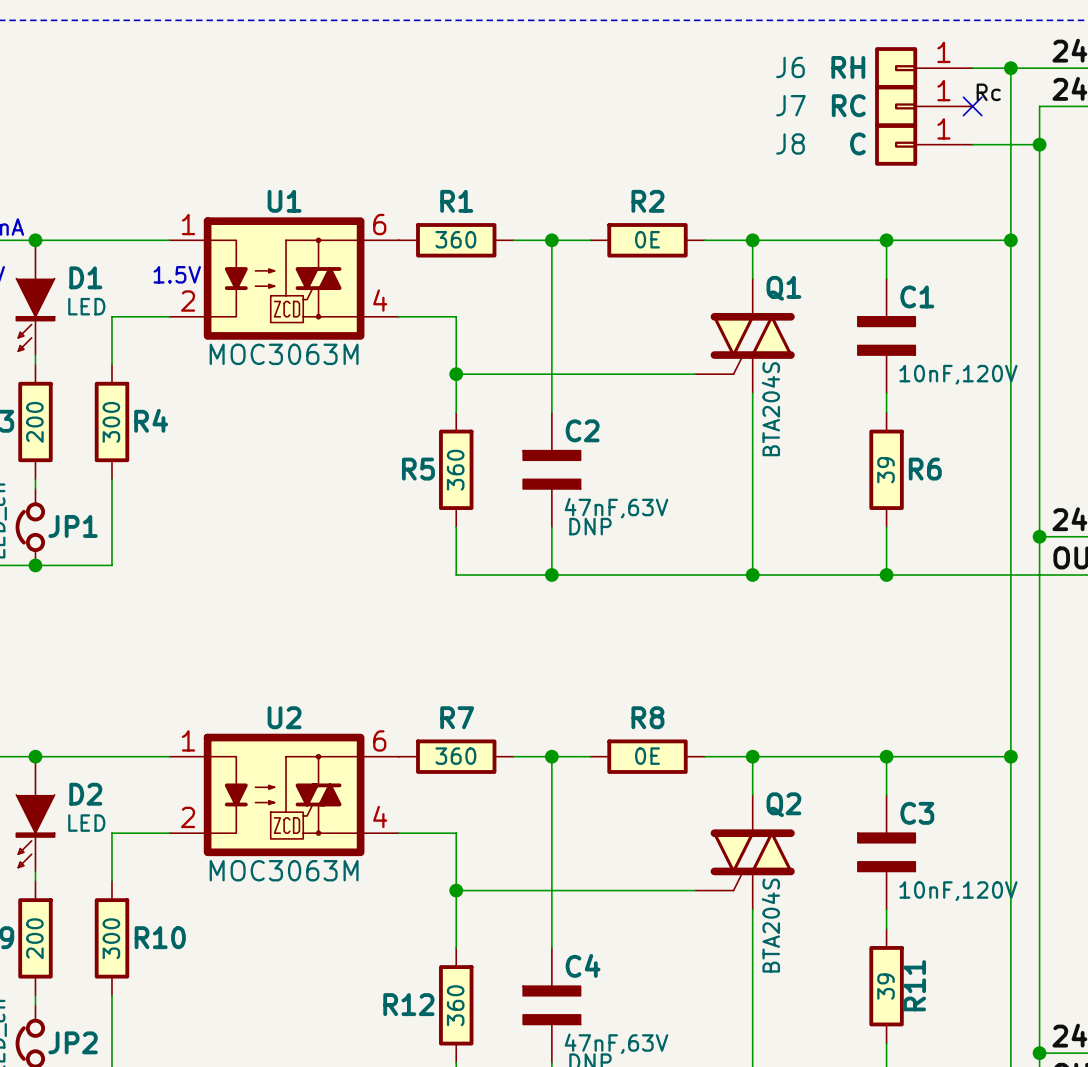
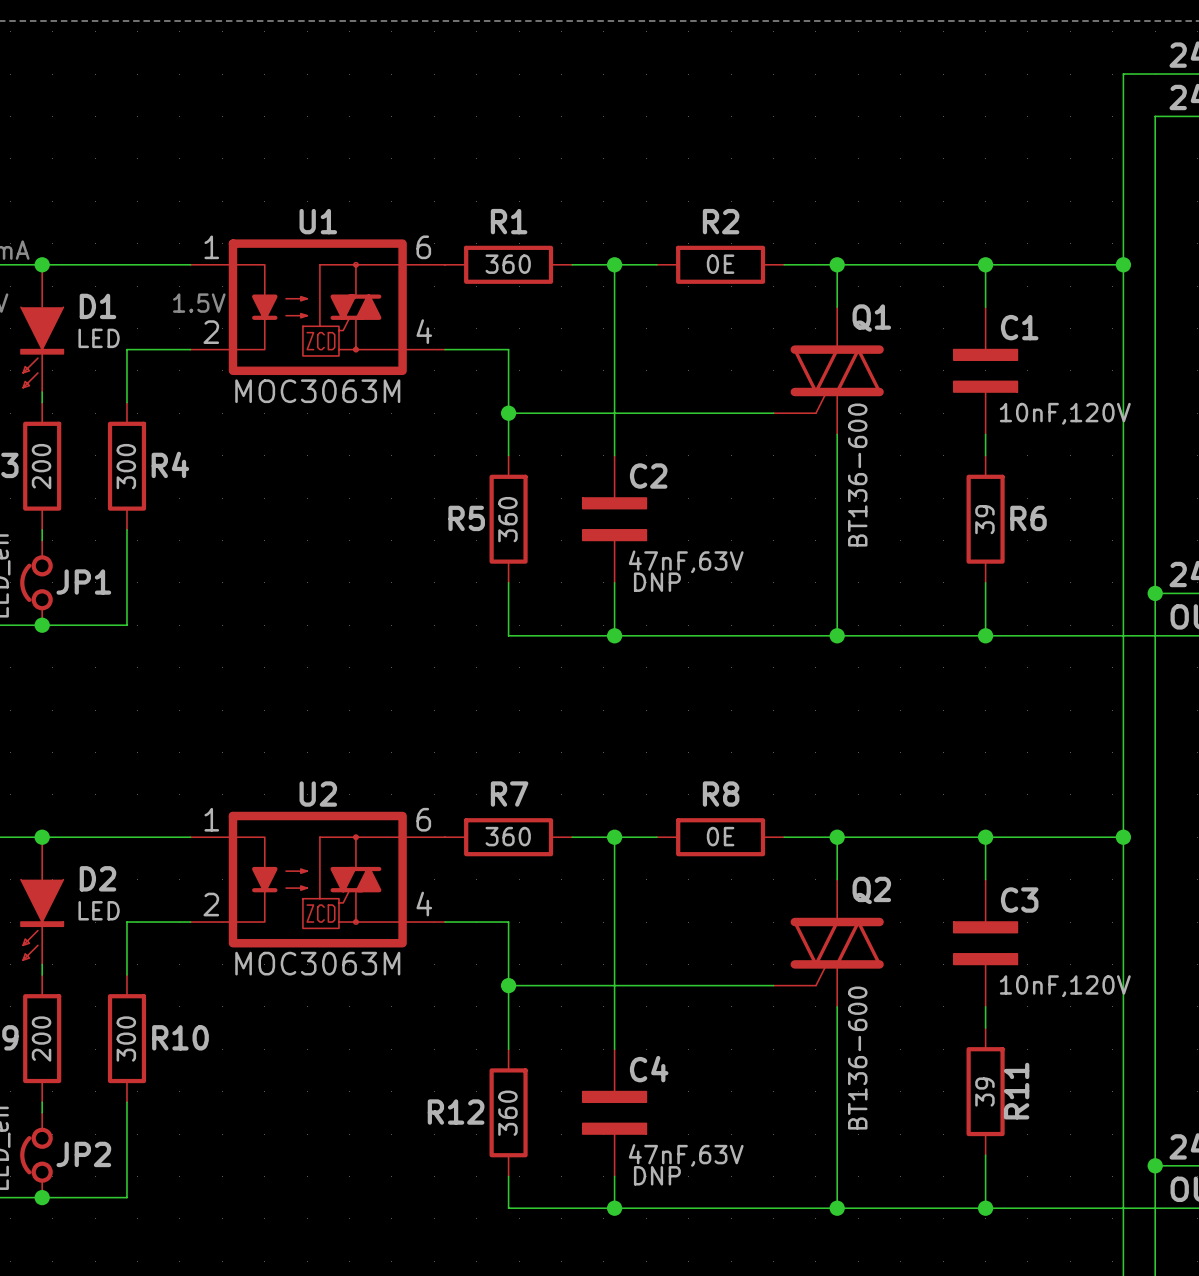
J6: RH (923, 68) -> none
wire: (972, 68) (1010, 68) -> none
junction: (1010, 68) -> none
label: Rc (988, 92) -> none
J7: RC (923, 106) -> none
no-connect mark: (972, 106) -> none
J8: C (923, 144) -> none
wire: (972, 144) (1039, 144) -> none
junction: (1039, 144) -> none
Q1 value: BTA204S (770, 409) -> BT136-600 (857, 475)
Q2 value: BTA204S (770, 925) -> BT136-600 (857, 1058)

